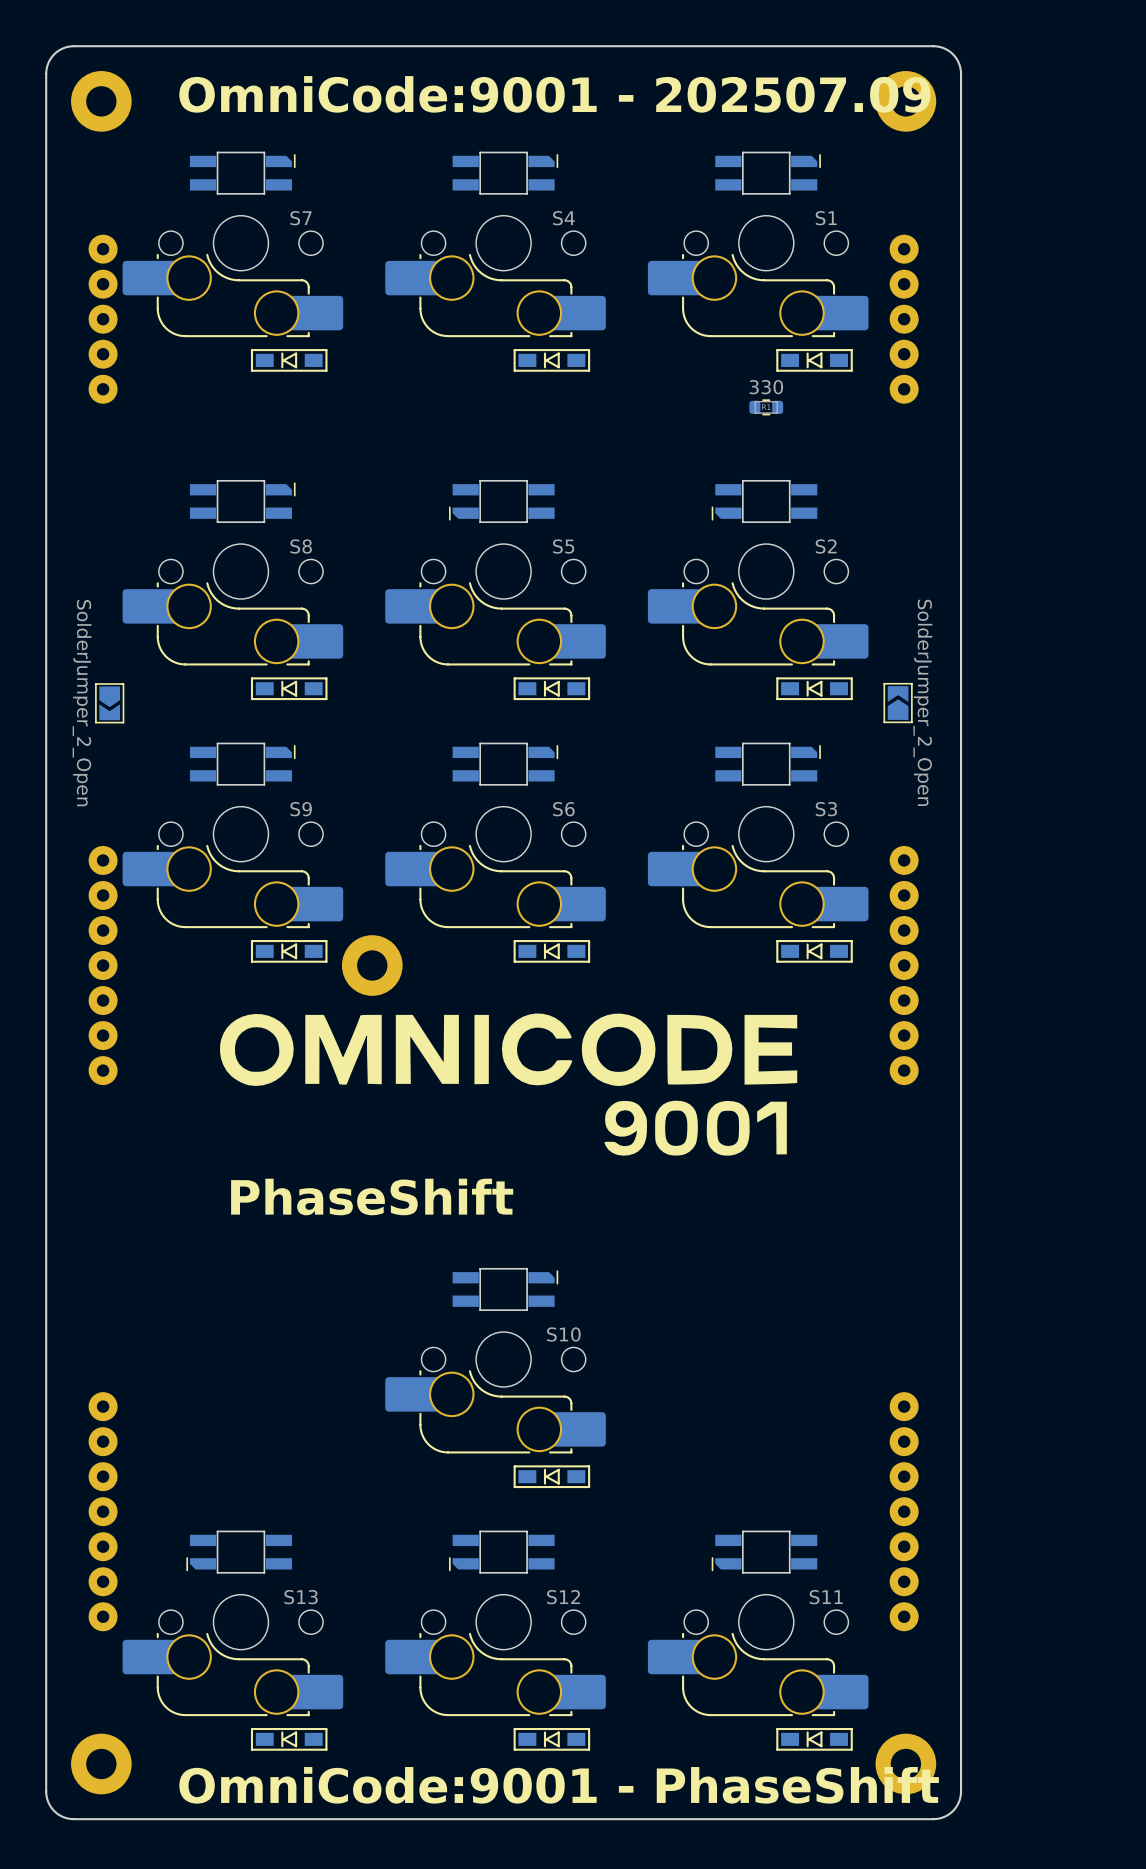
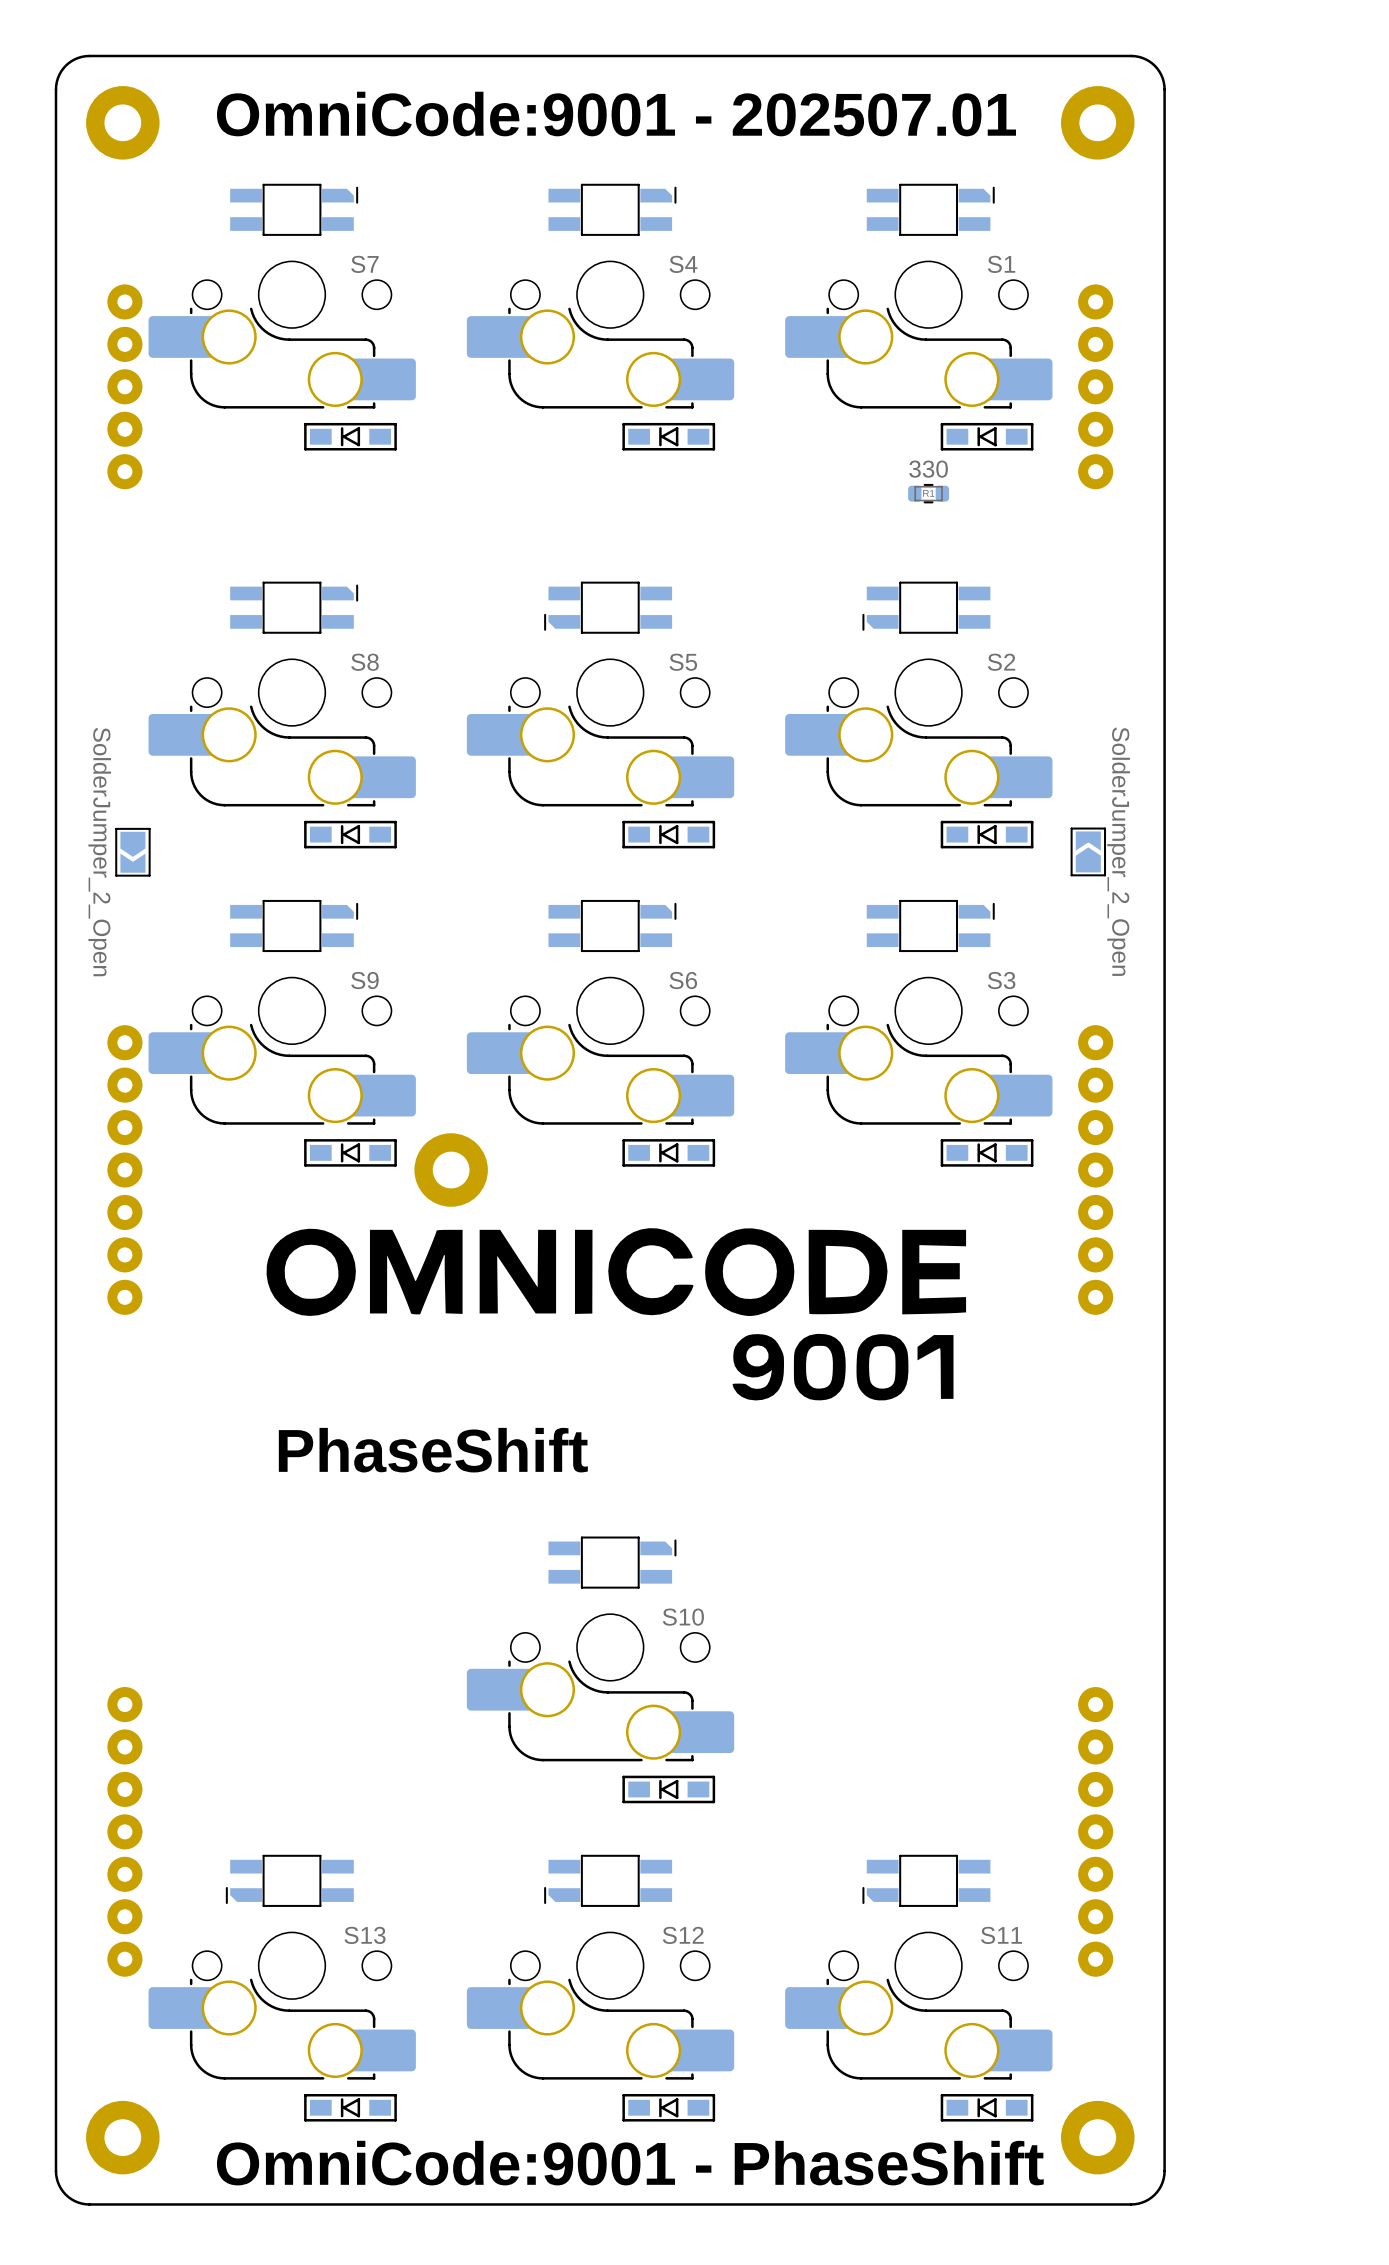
text: OmniCode:9001 - 202507.09 (554, 94) -> OmniCode:9001 - 202507.01 (616, 114)

